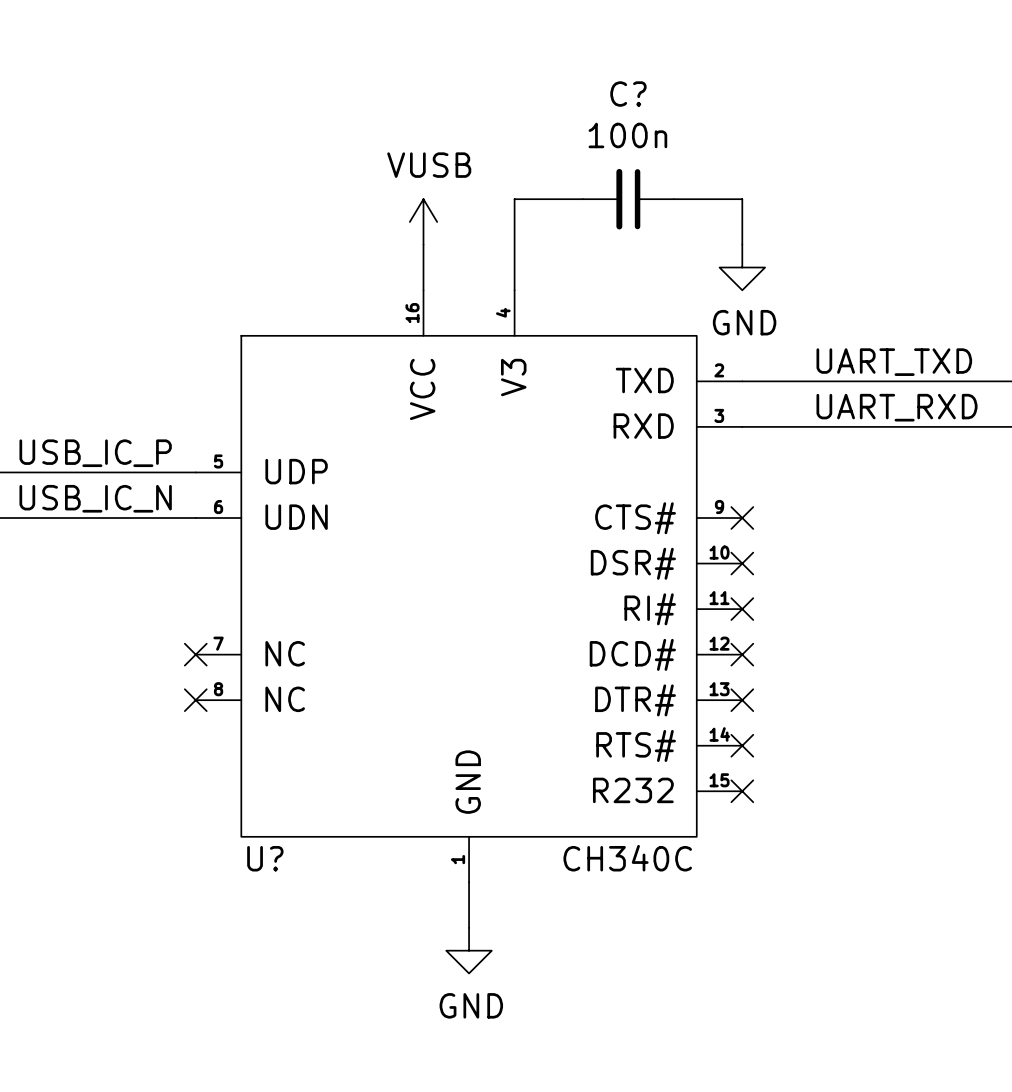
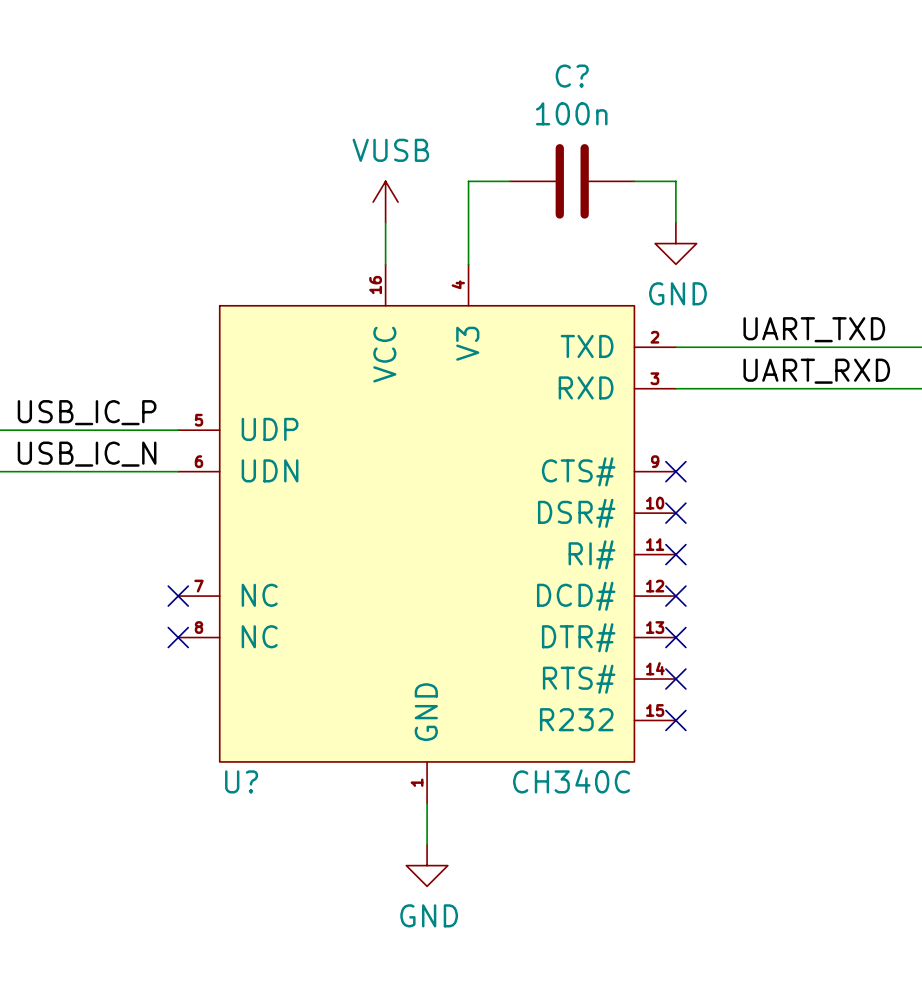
C? symbol: [582, 168, 674, 230] -> [510, 144, 635, 219]

